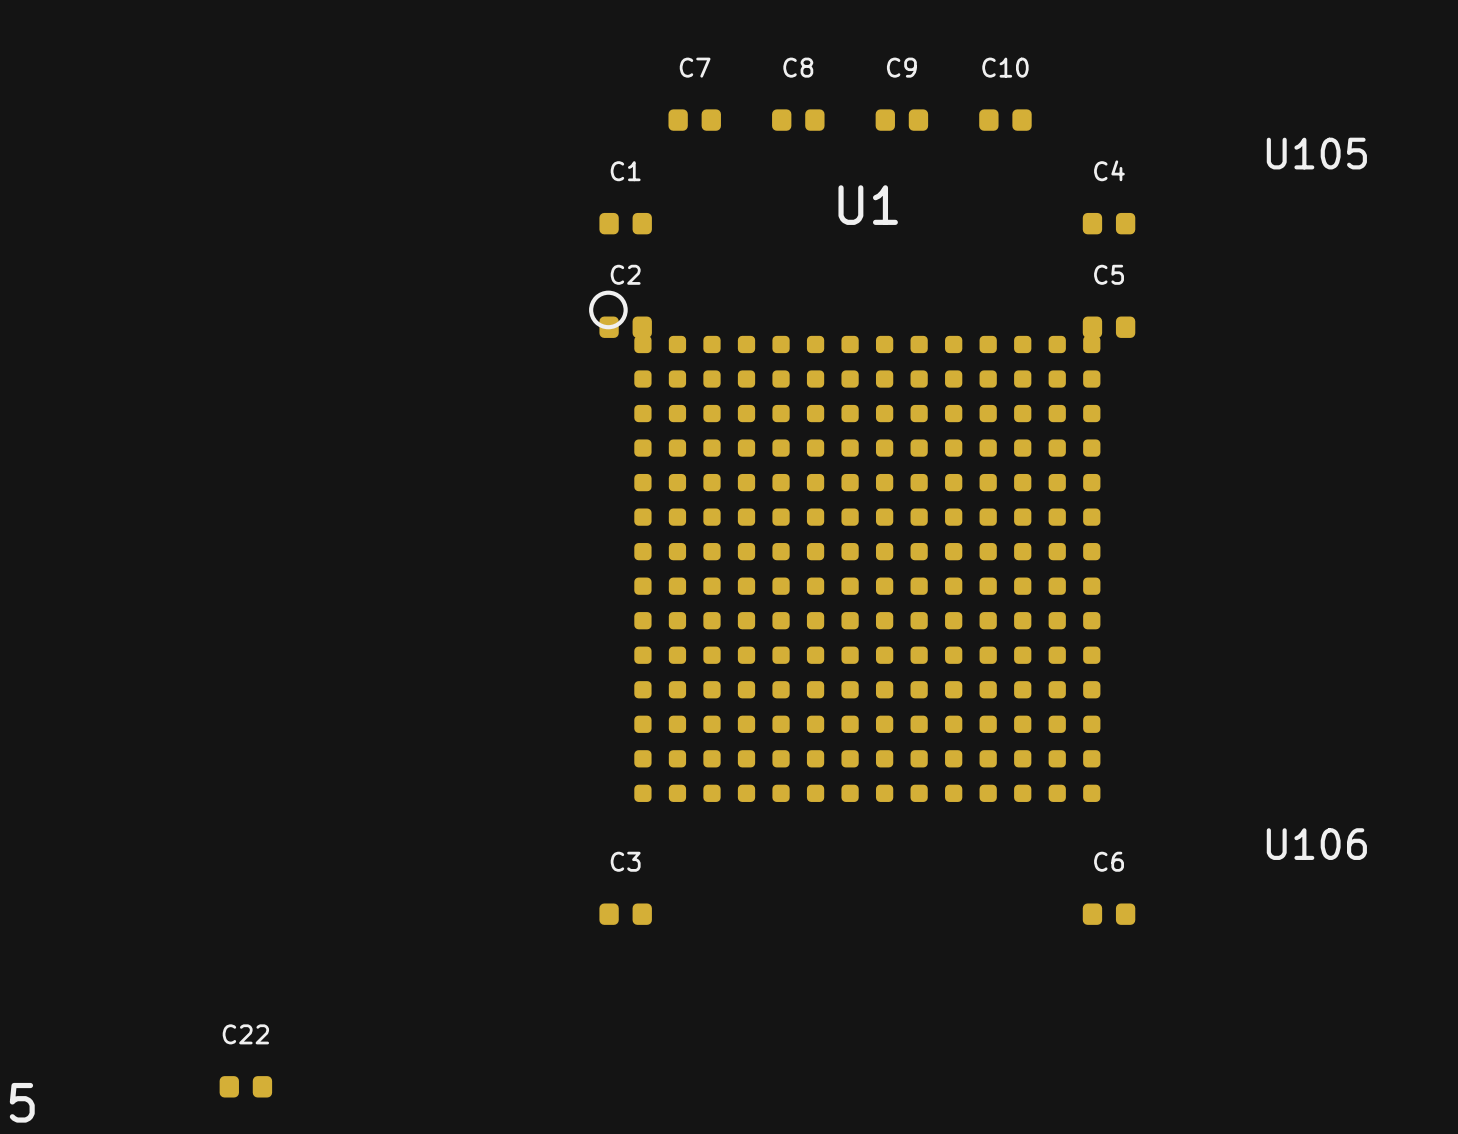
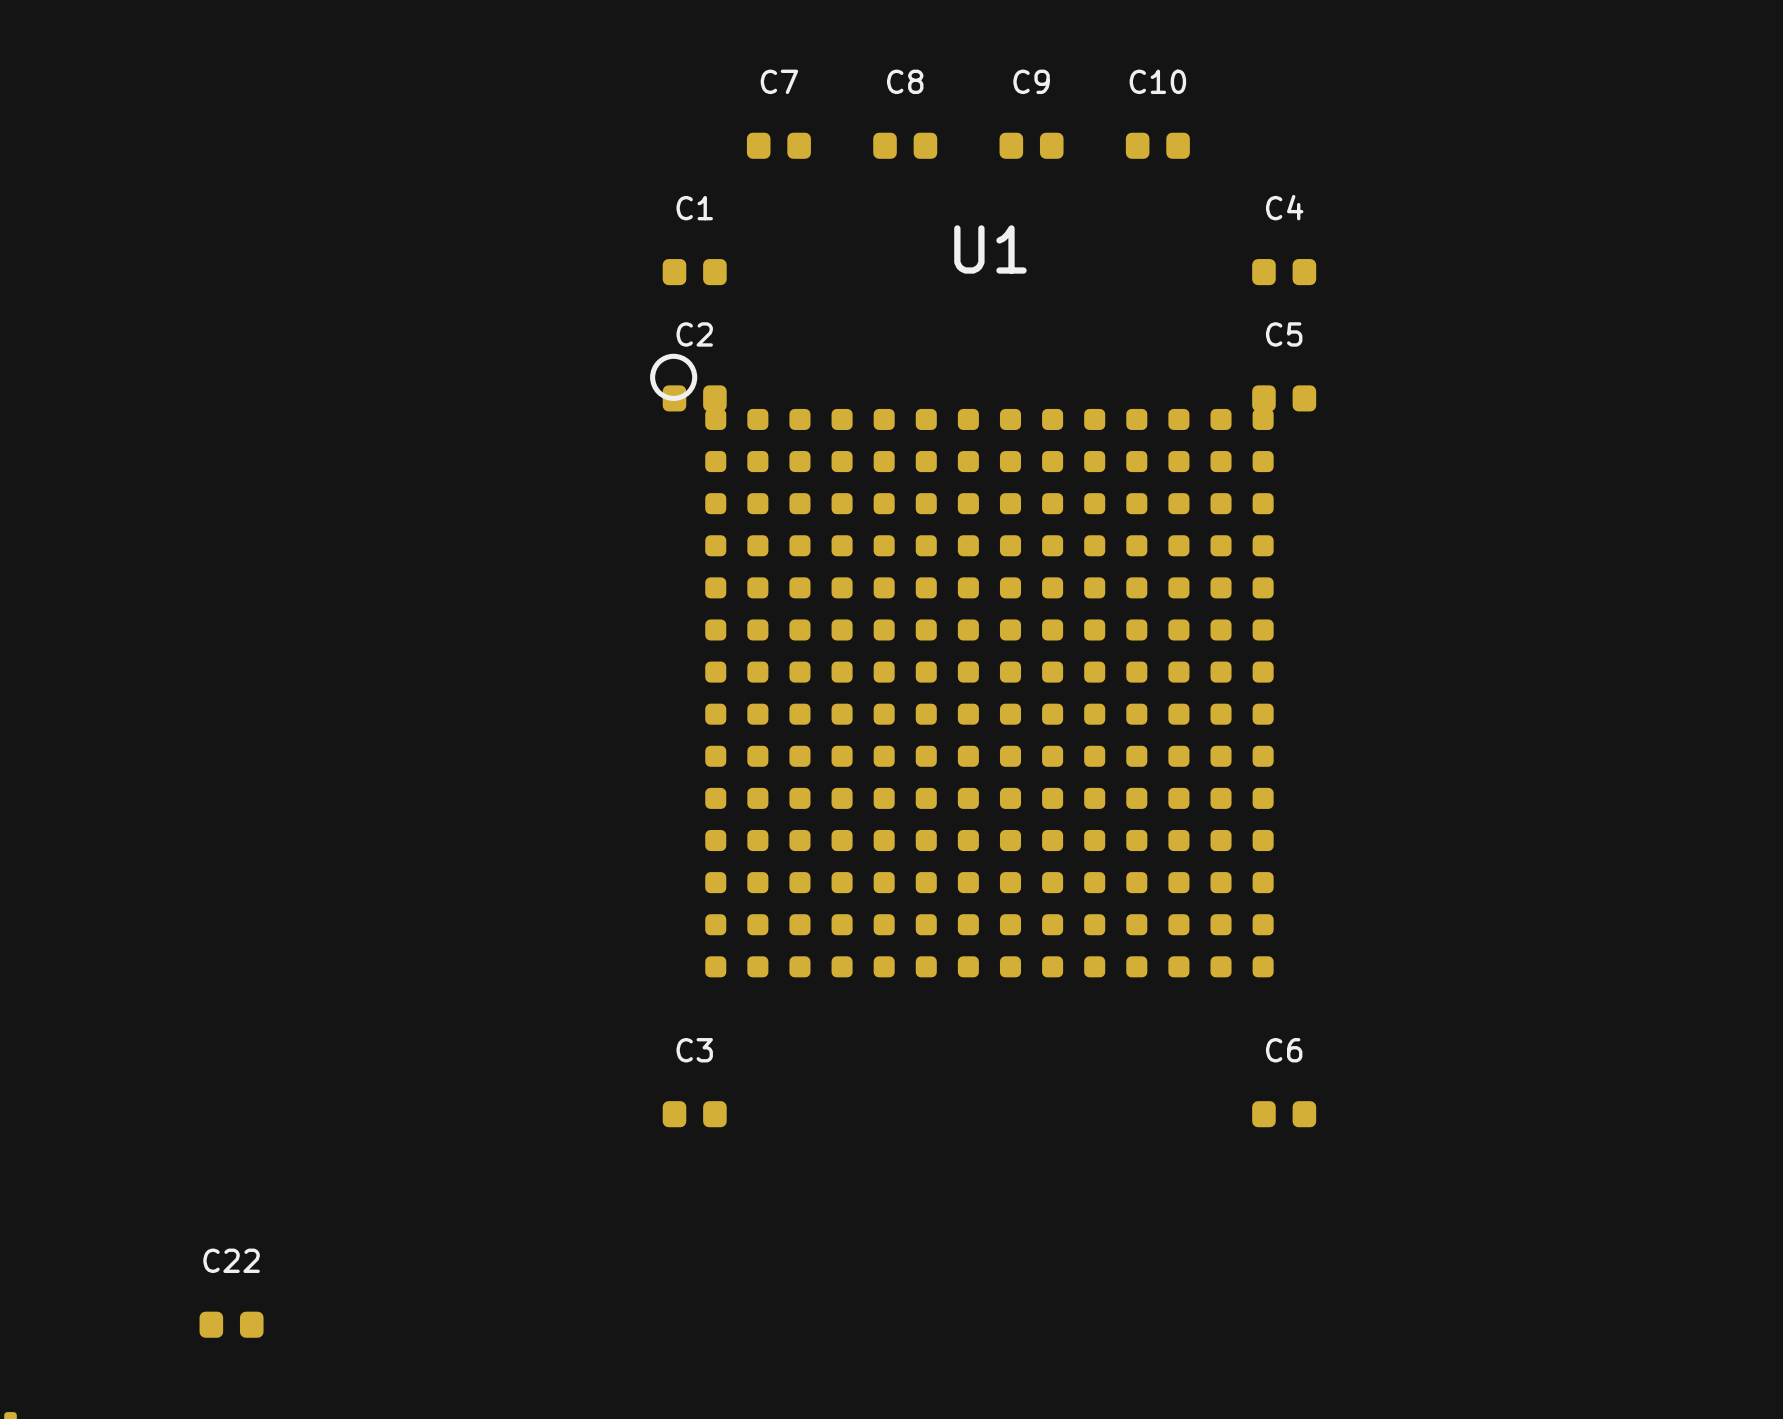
U105: (1316, 153) -> none
U106: (1316, 844) -> none

